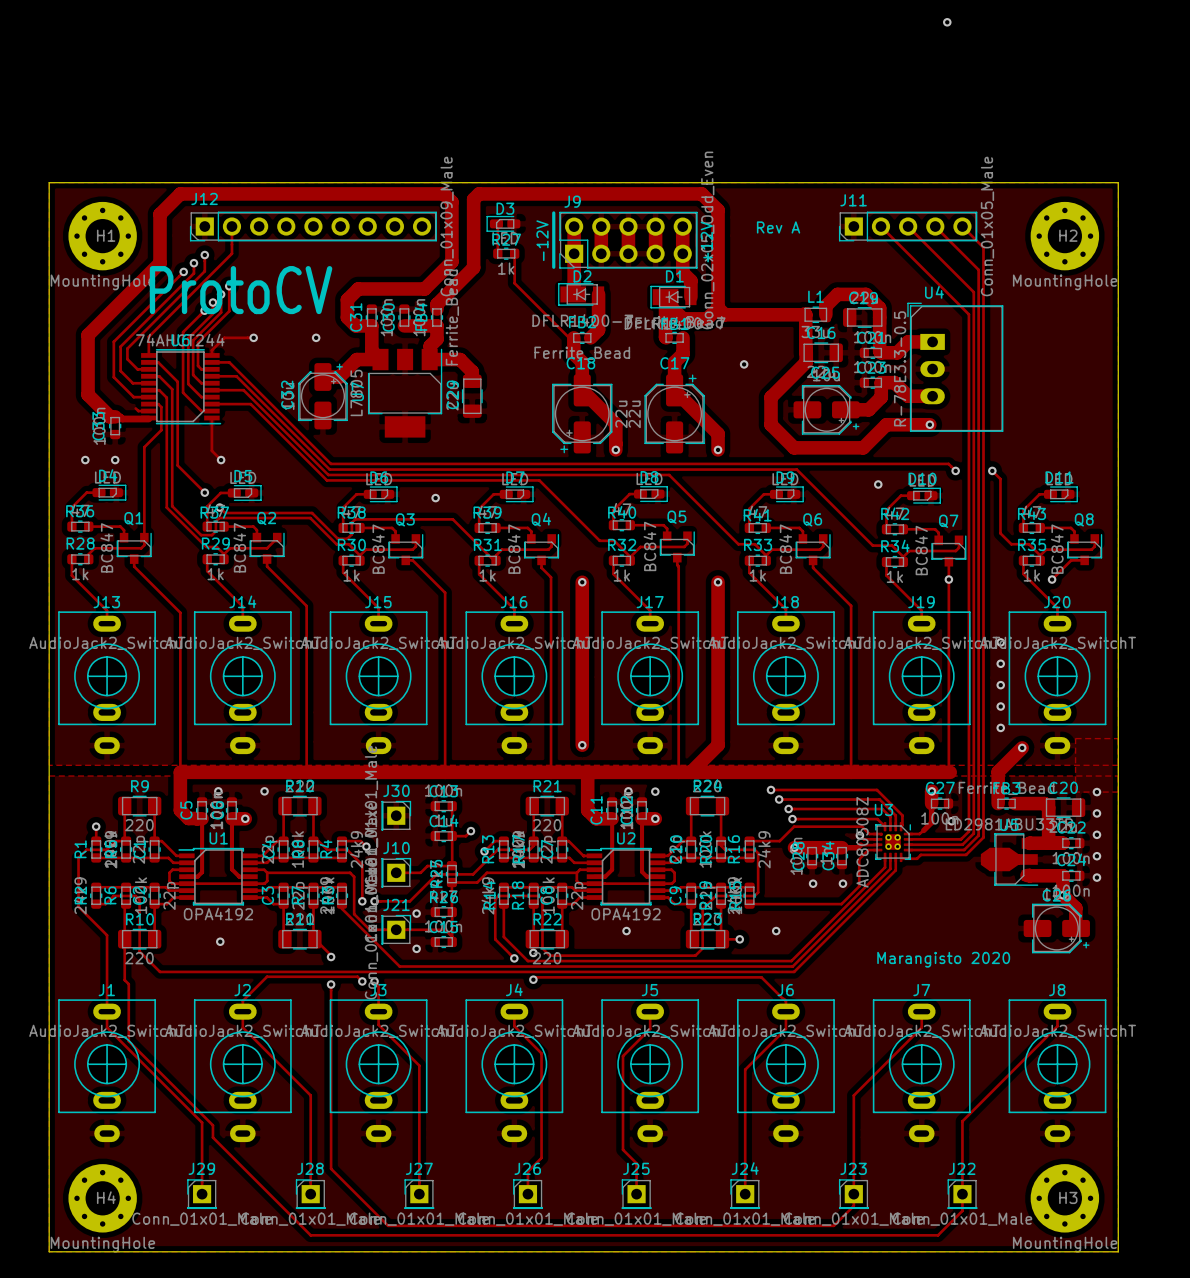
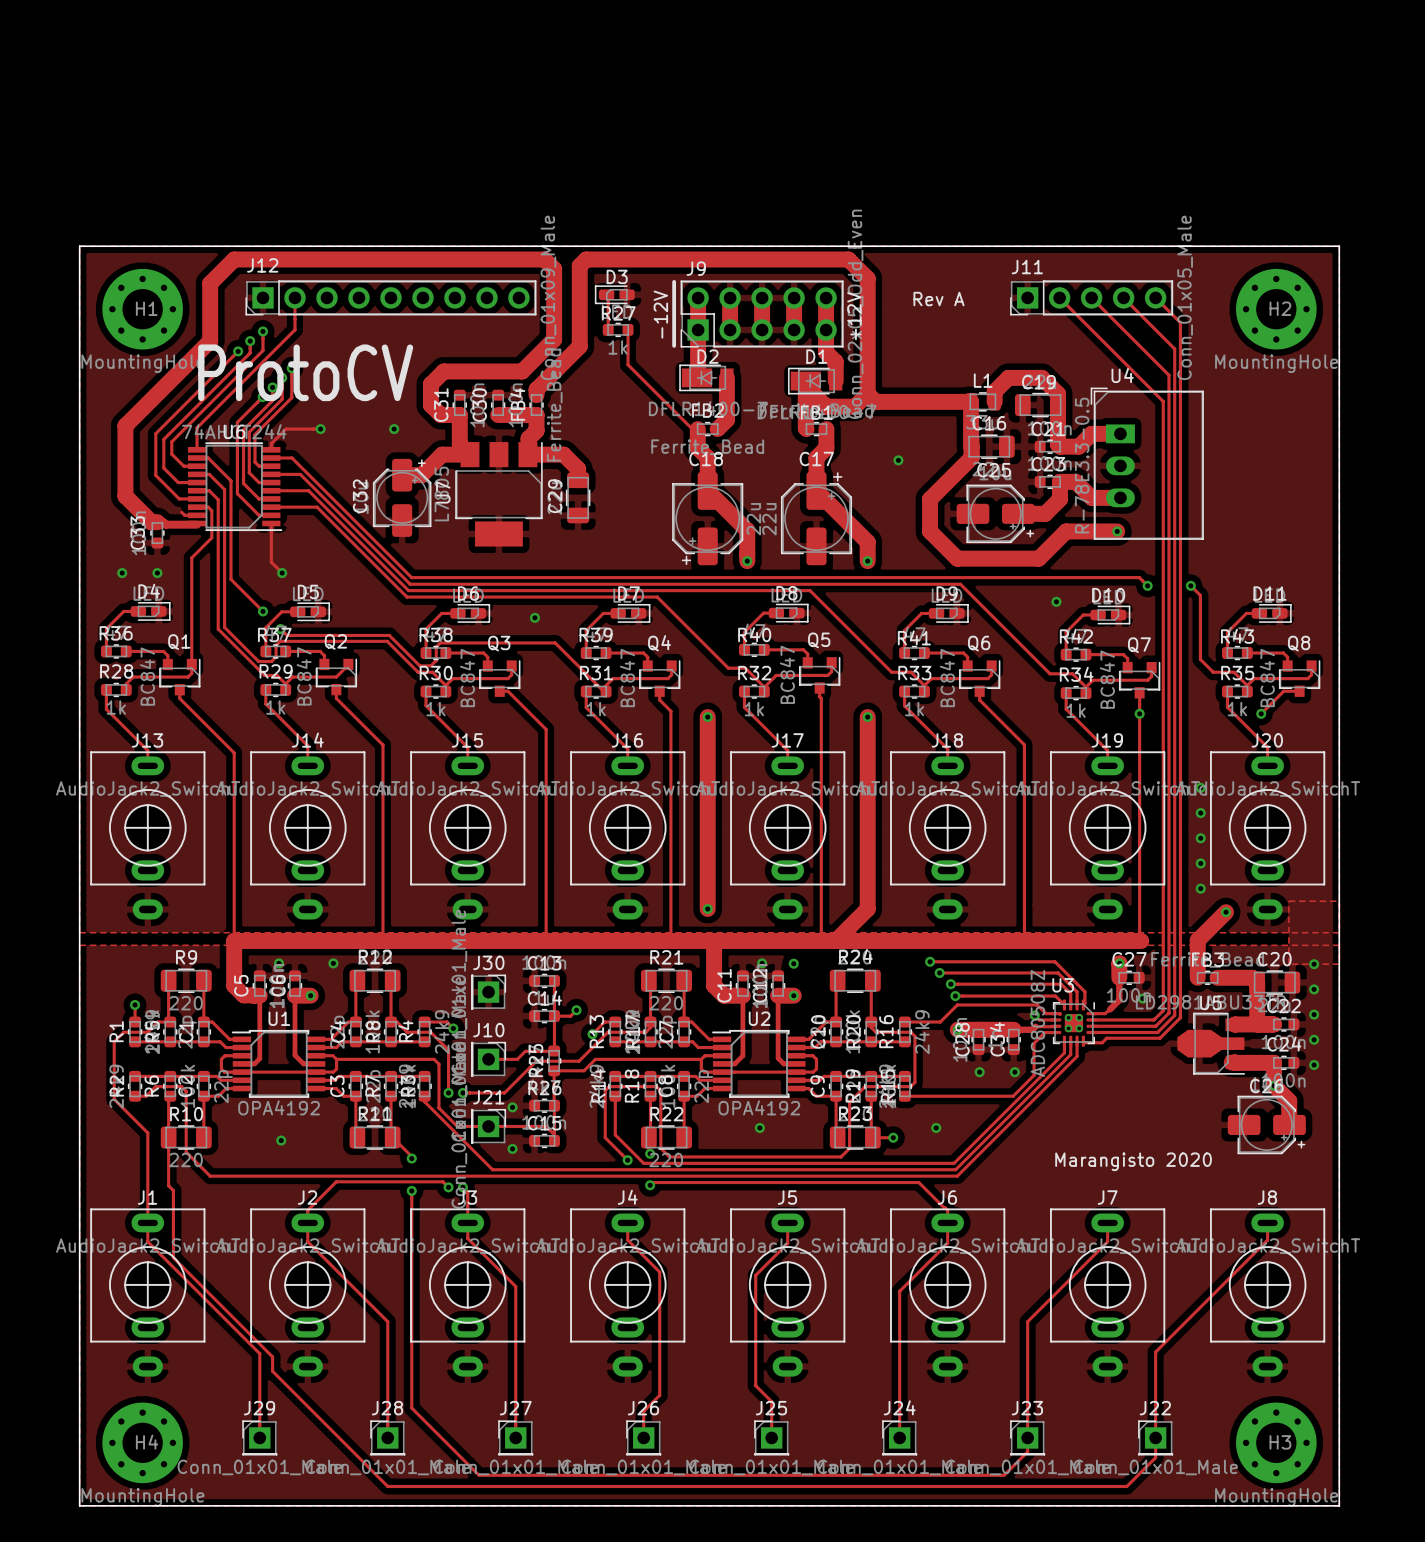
via: (947, 22) -> none

